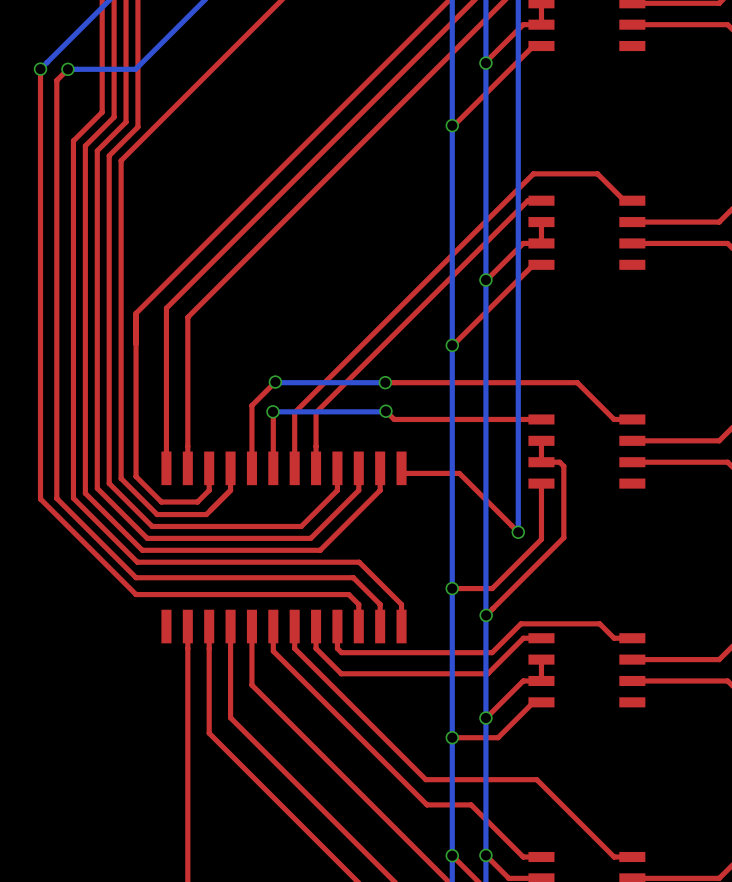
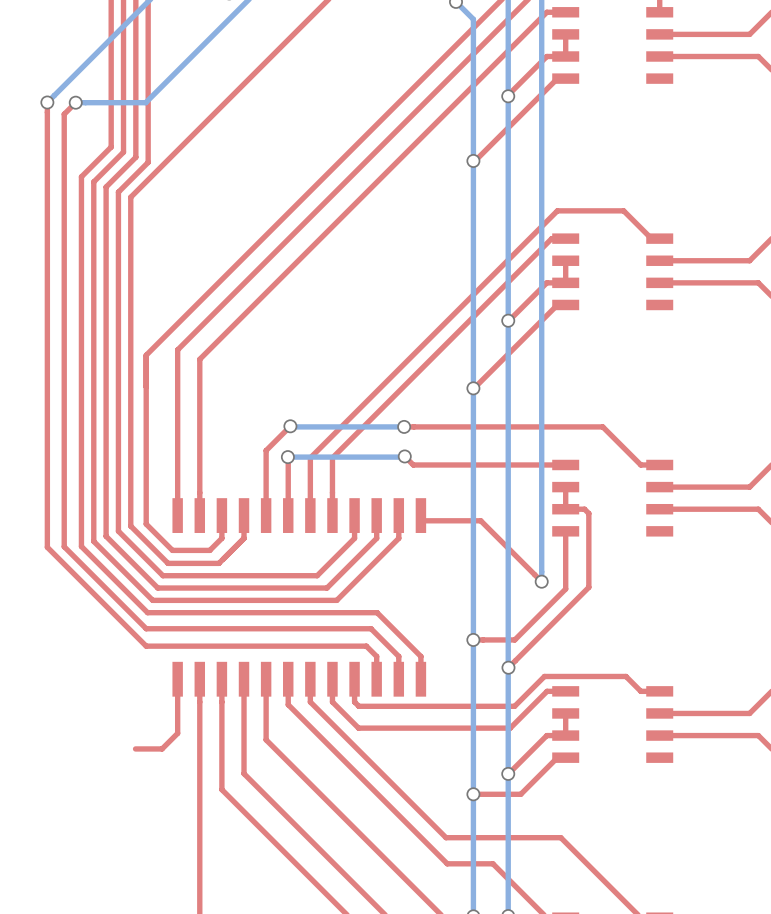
top track: none -> (177, 679) (177, 733) (162, 748) (135, 748)

